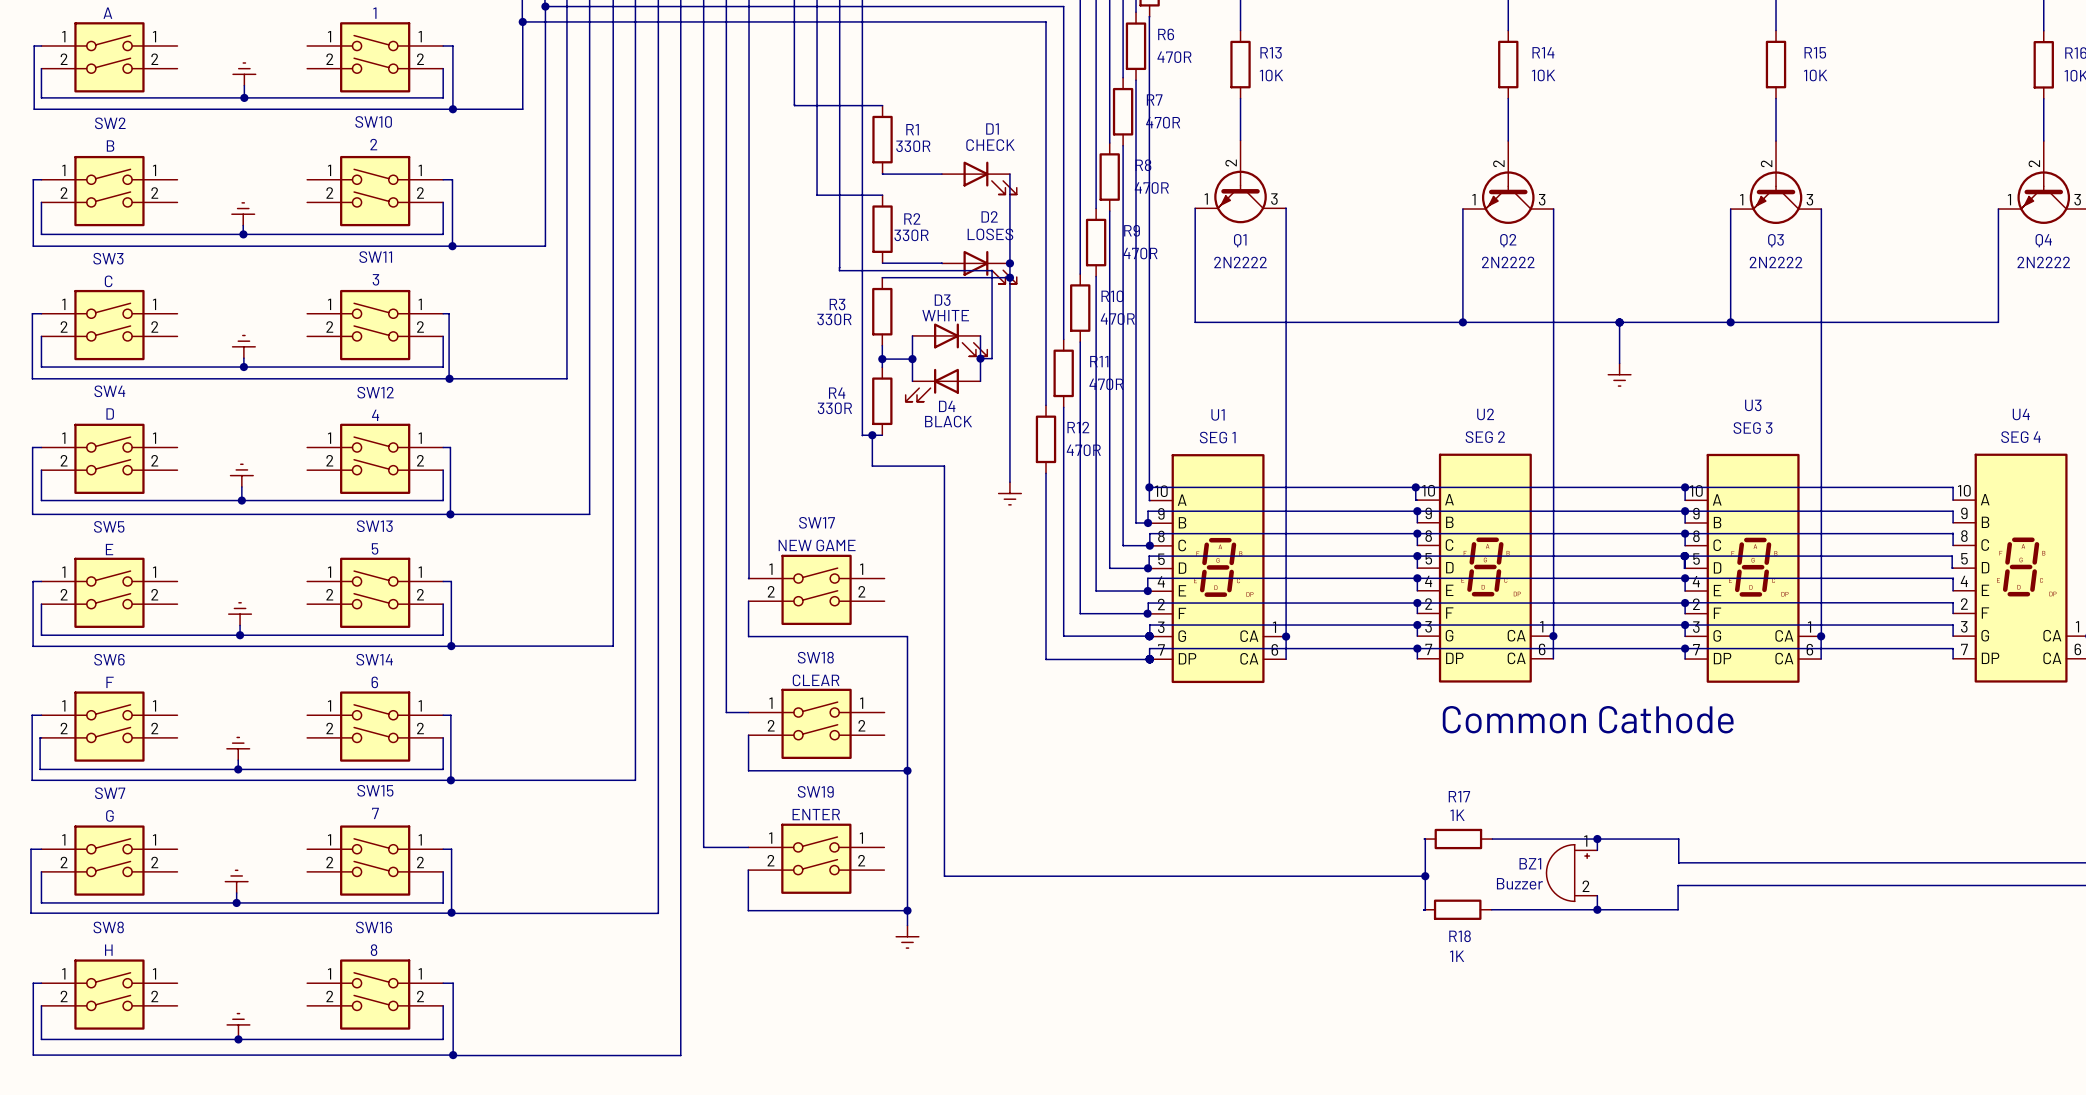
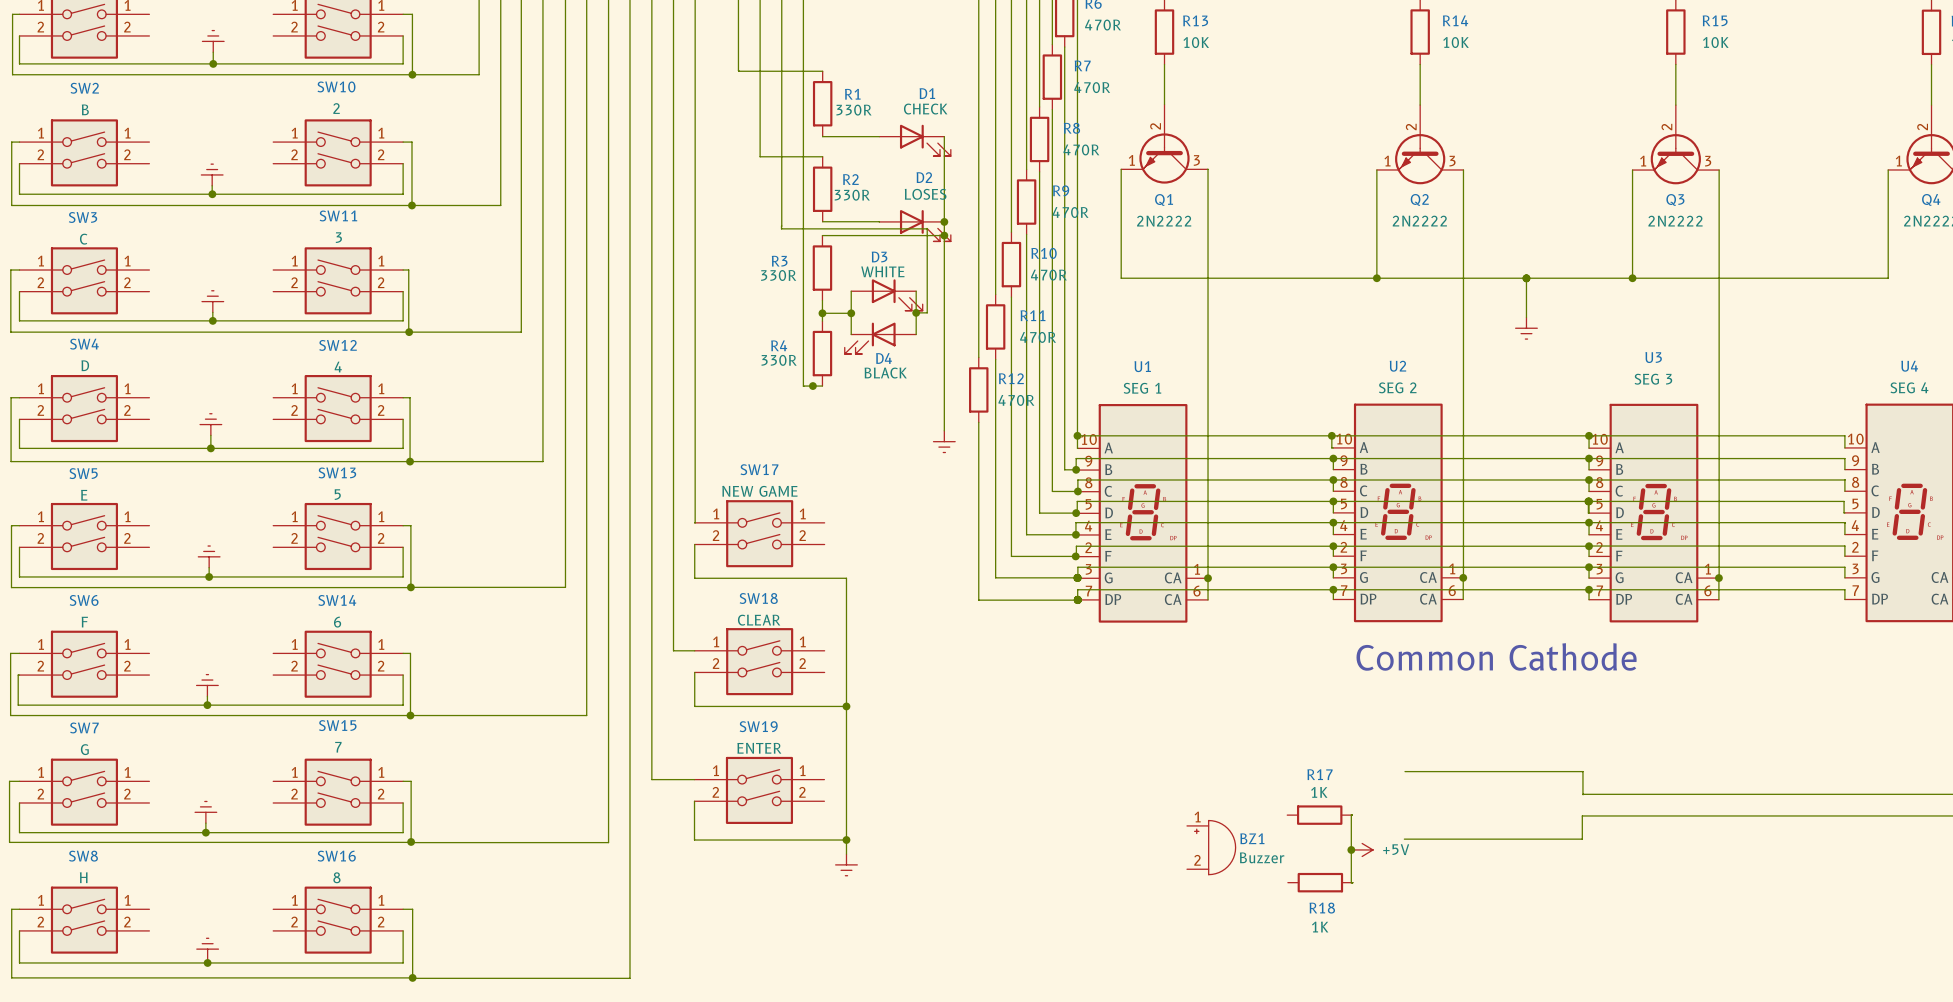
wire: (872, 435) (872, 466) (944, 466) (944, 876) (1425, 876) -> none
wire: (1424, 839) (1425, 909) (1423, 909) -> none
R17 position: (1458, 839) -> (1319, 815)
wire: (1597, 839) (1597, 850) -> none
junction: (1597, 839) -> none
BZ1 flip: as is (1567, 873) -> left-right (1215, 847)
BZ1 position: (1571, 873) -> (1211, 847)
junction position: (1425, 876) -> (1351, 849)
wire: none -> (1352, 815) (1351, 882) (1352, 882)
wire: (1597, 895) (1597, 909) -> none
R18 position: (1457, 909) -> (1320, 882)
junction: (1597, 909) -> none
power symbol: none -> +5V (1362, 849)

